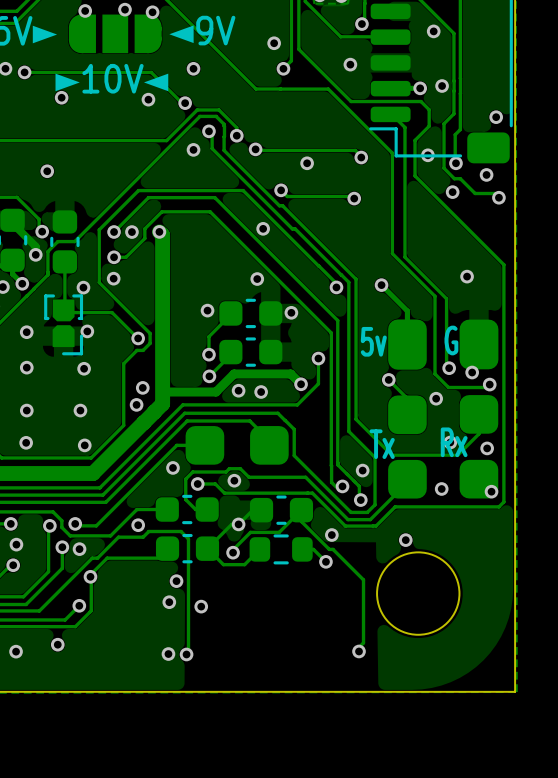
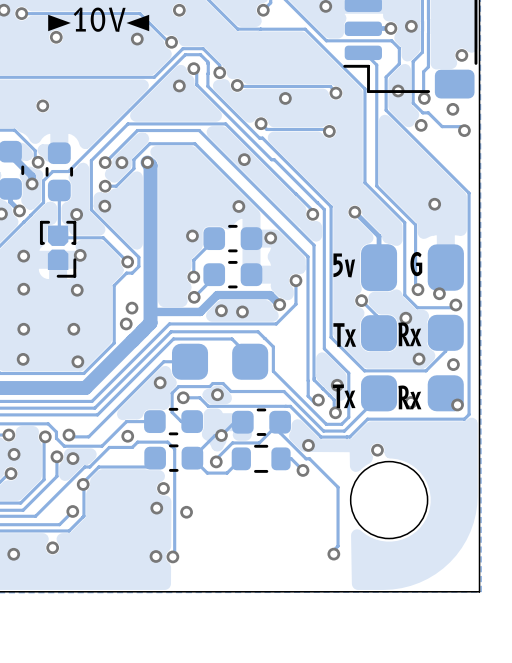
text: none -> Rx (409, 334)
text: none -> Tx (344, 334)
text: Rx (454, 442) -> none
text: Tx (382, 444) -> none
text: none -> Tx (344, 396)
text: none -> Rx (409, 397)

